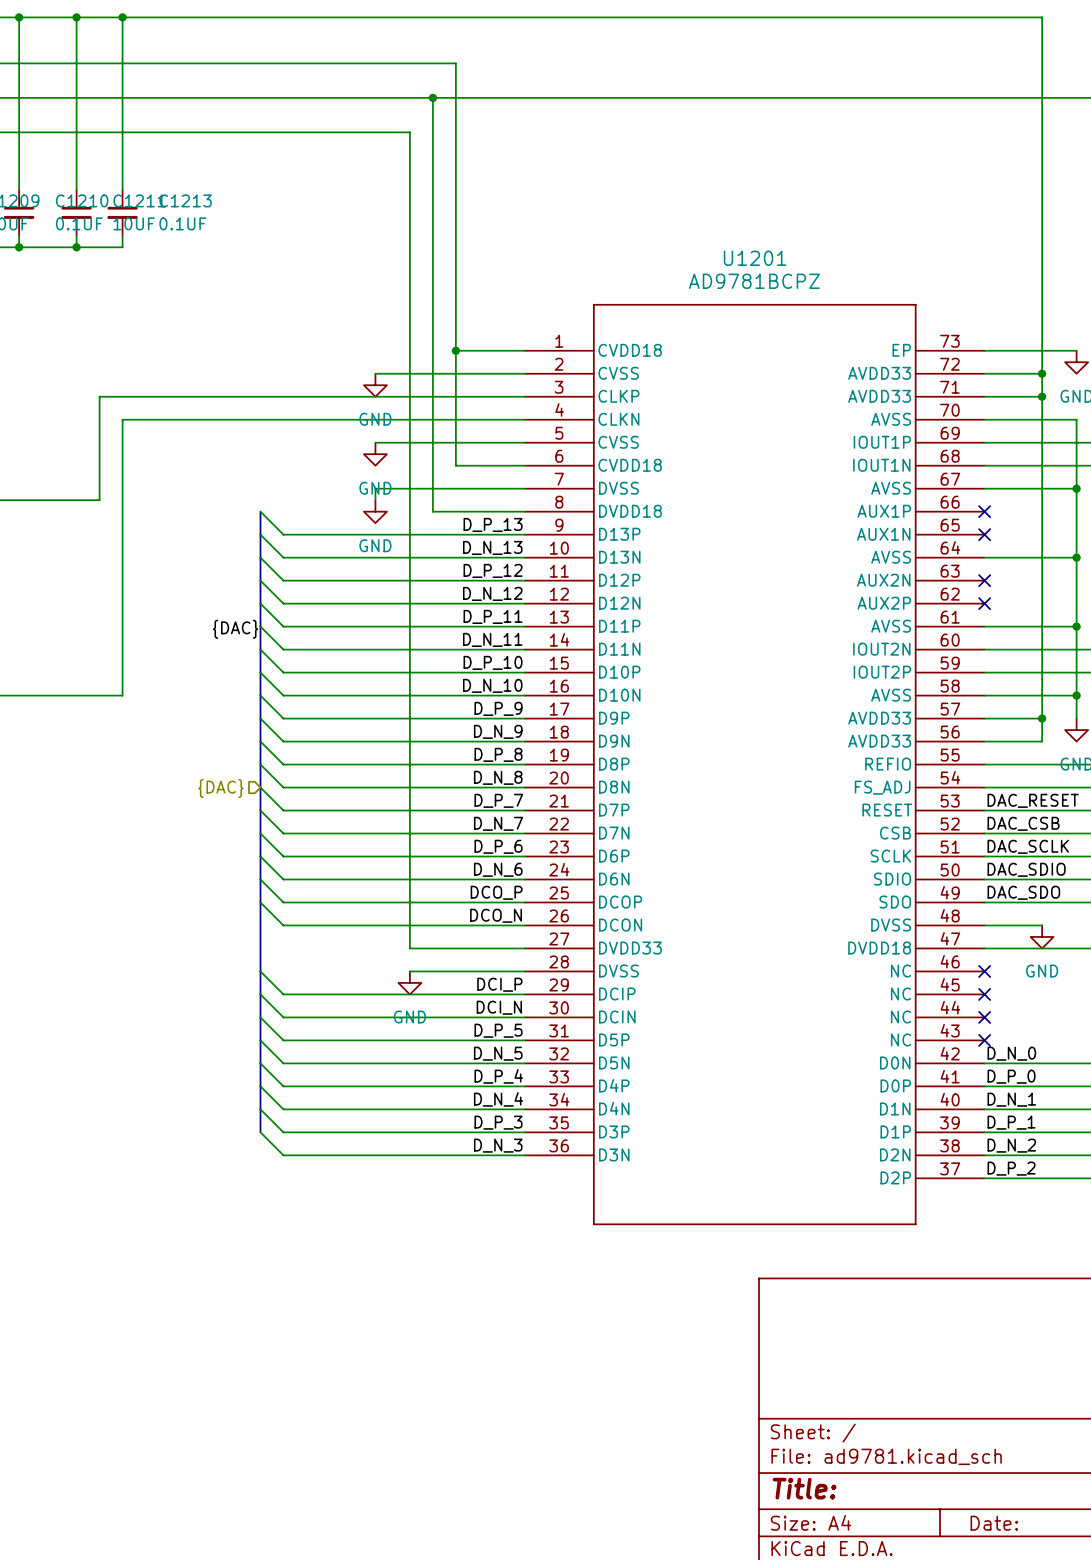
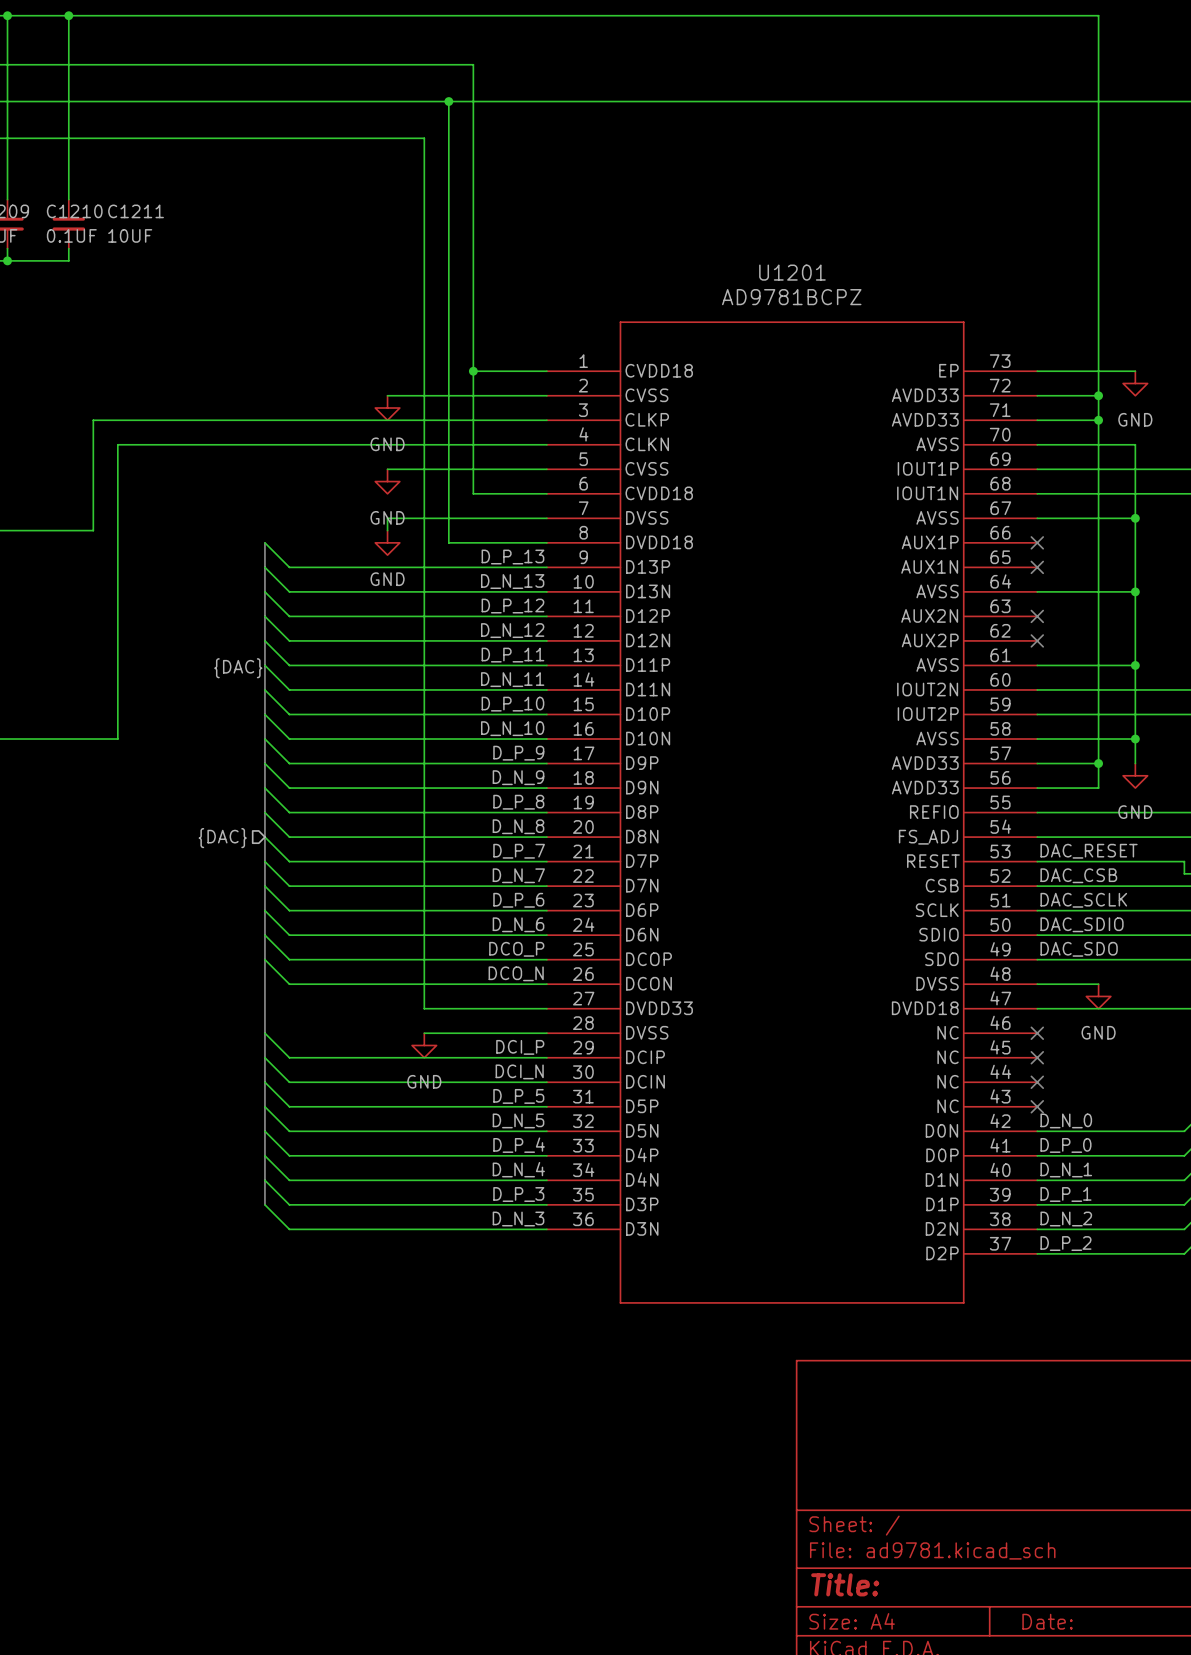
wire: (122, 17) (122, 189) -> none
junction: (122, 17) -> none
C1213: 0.1UF (122, 212) -> none
wire: (122, 235) (122, 247) (76, 247) -> none
junction: (76, 247) -> none

